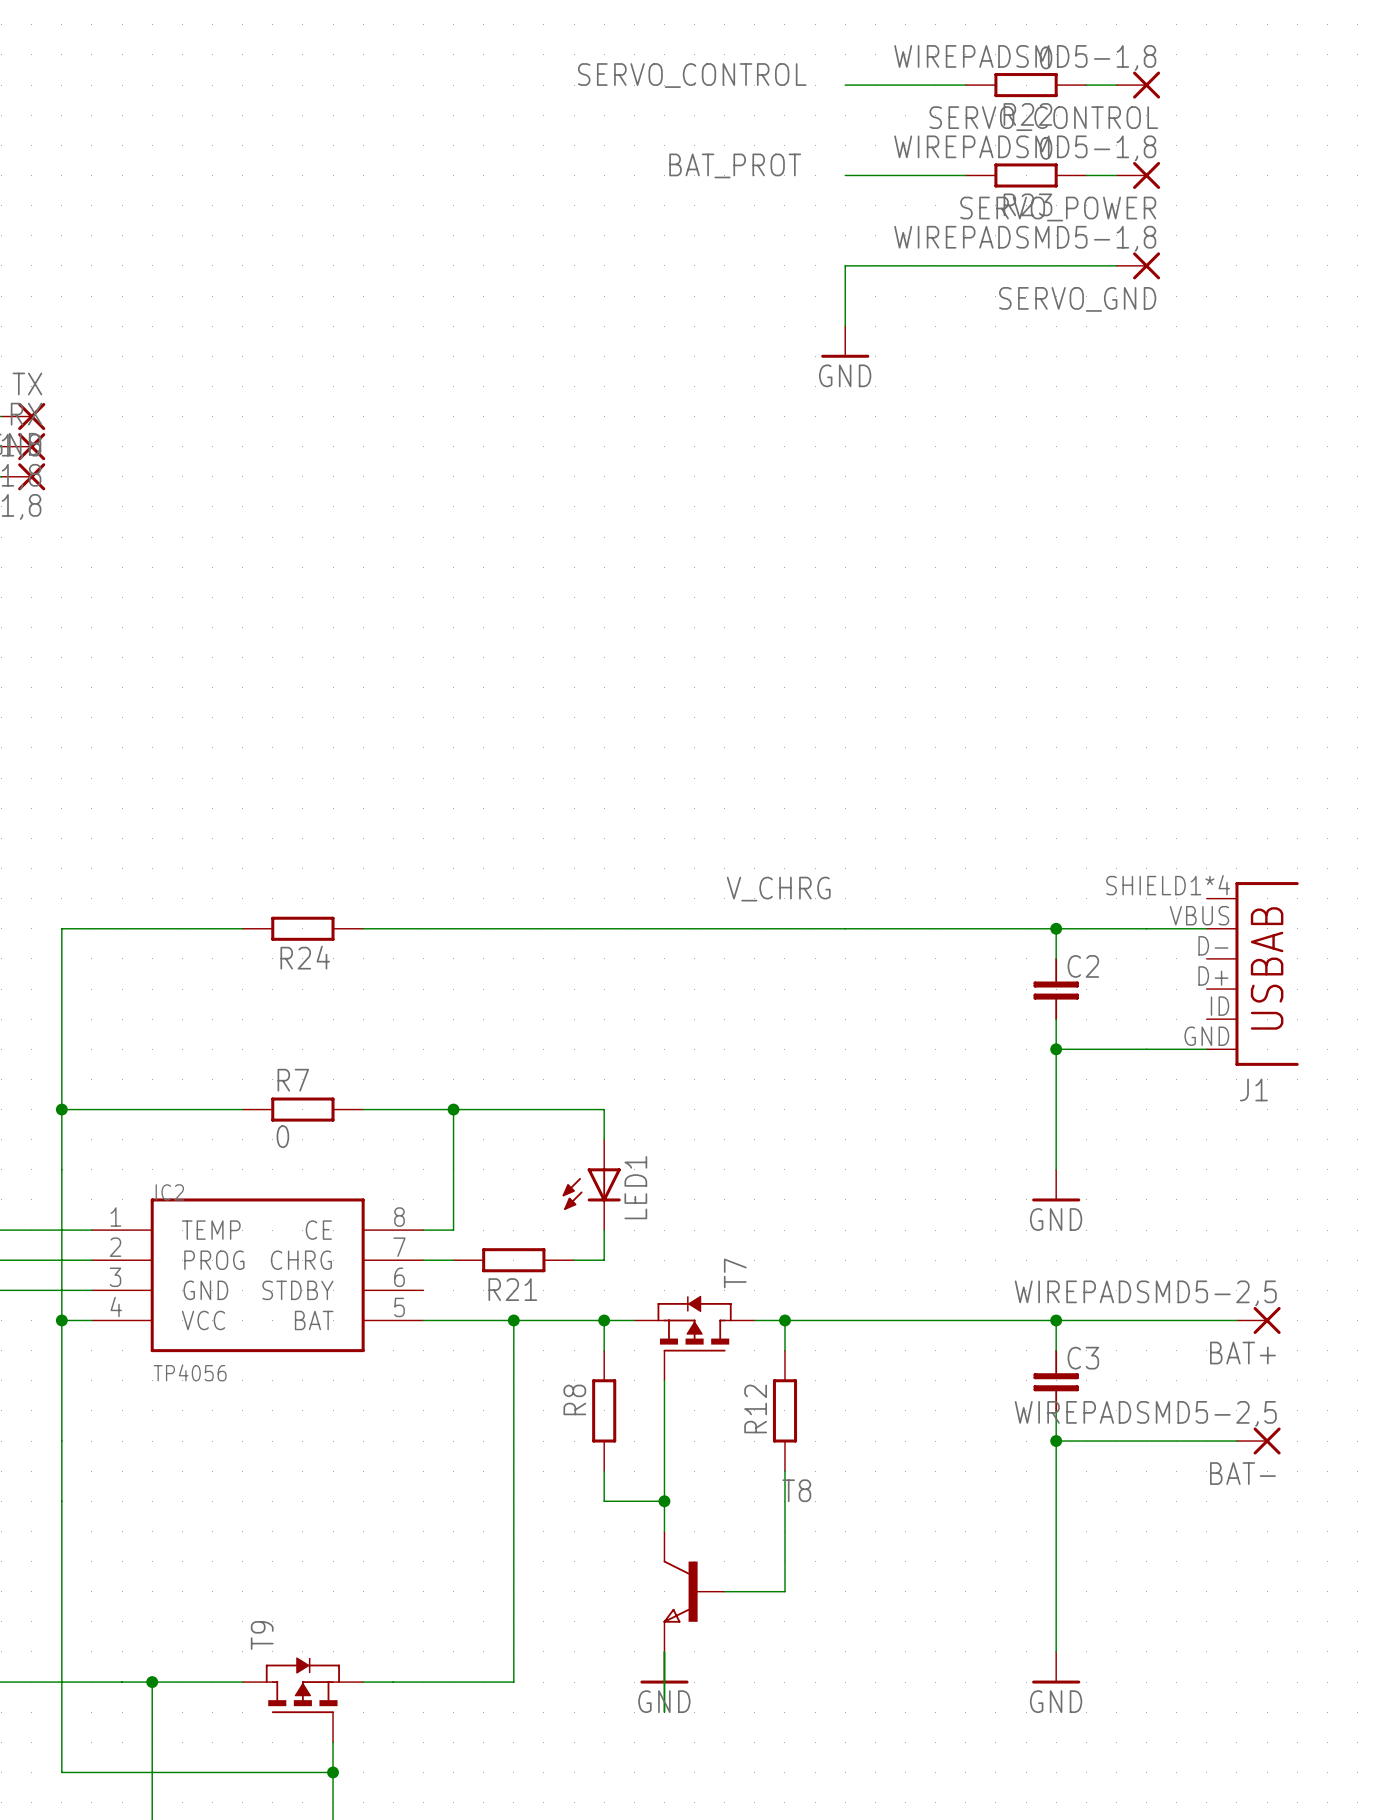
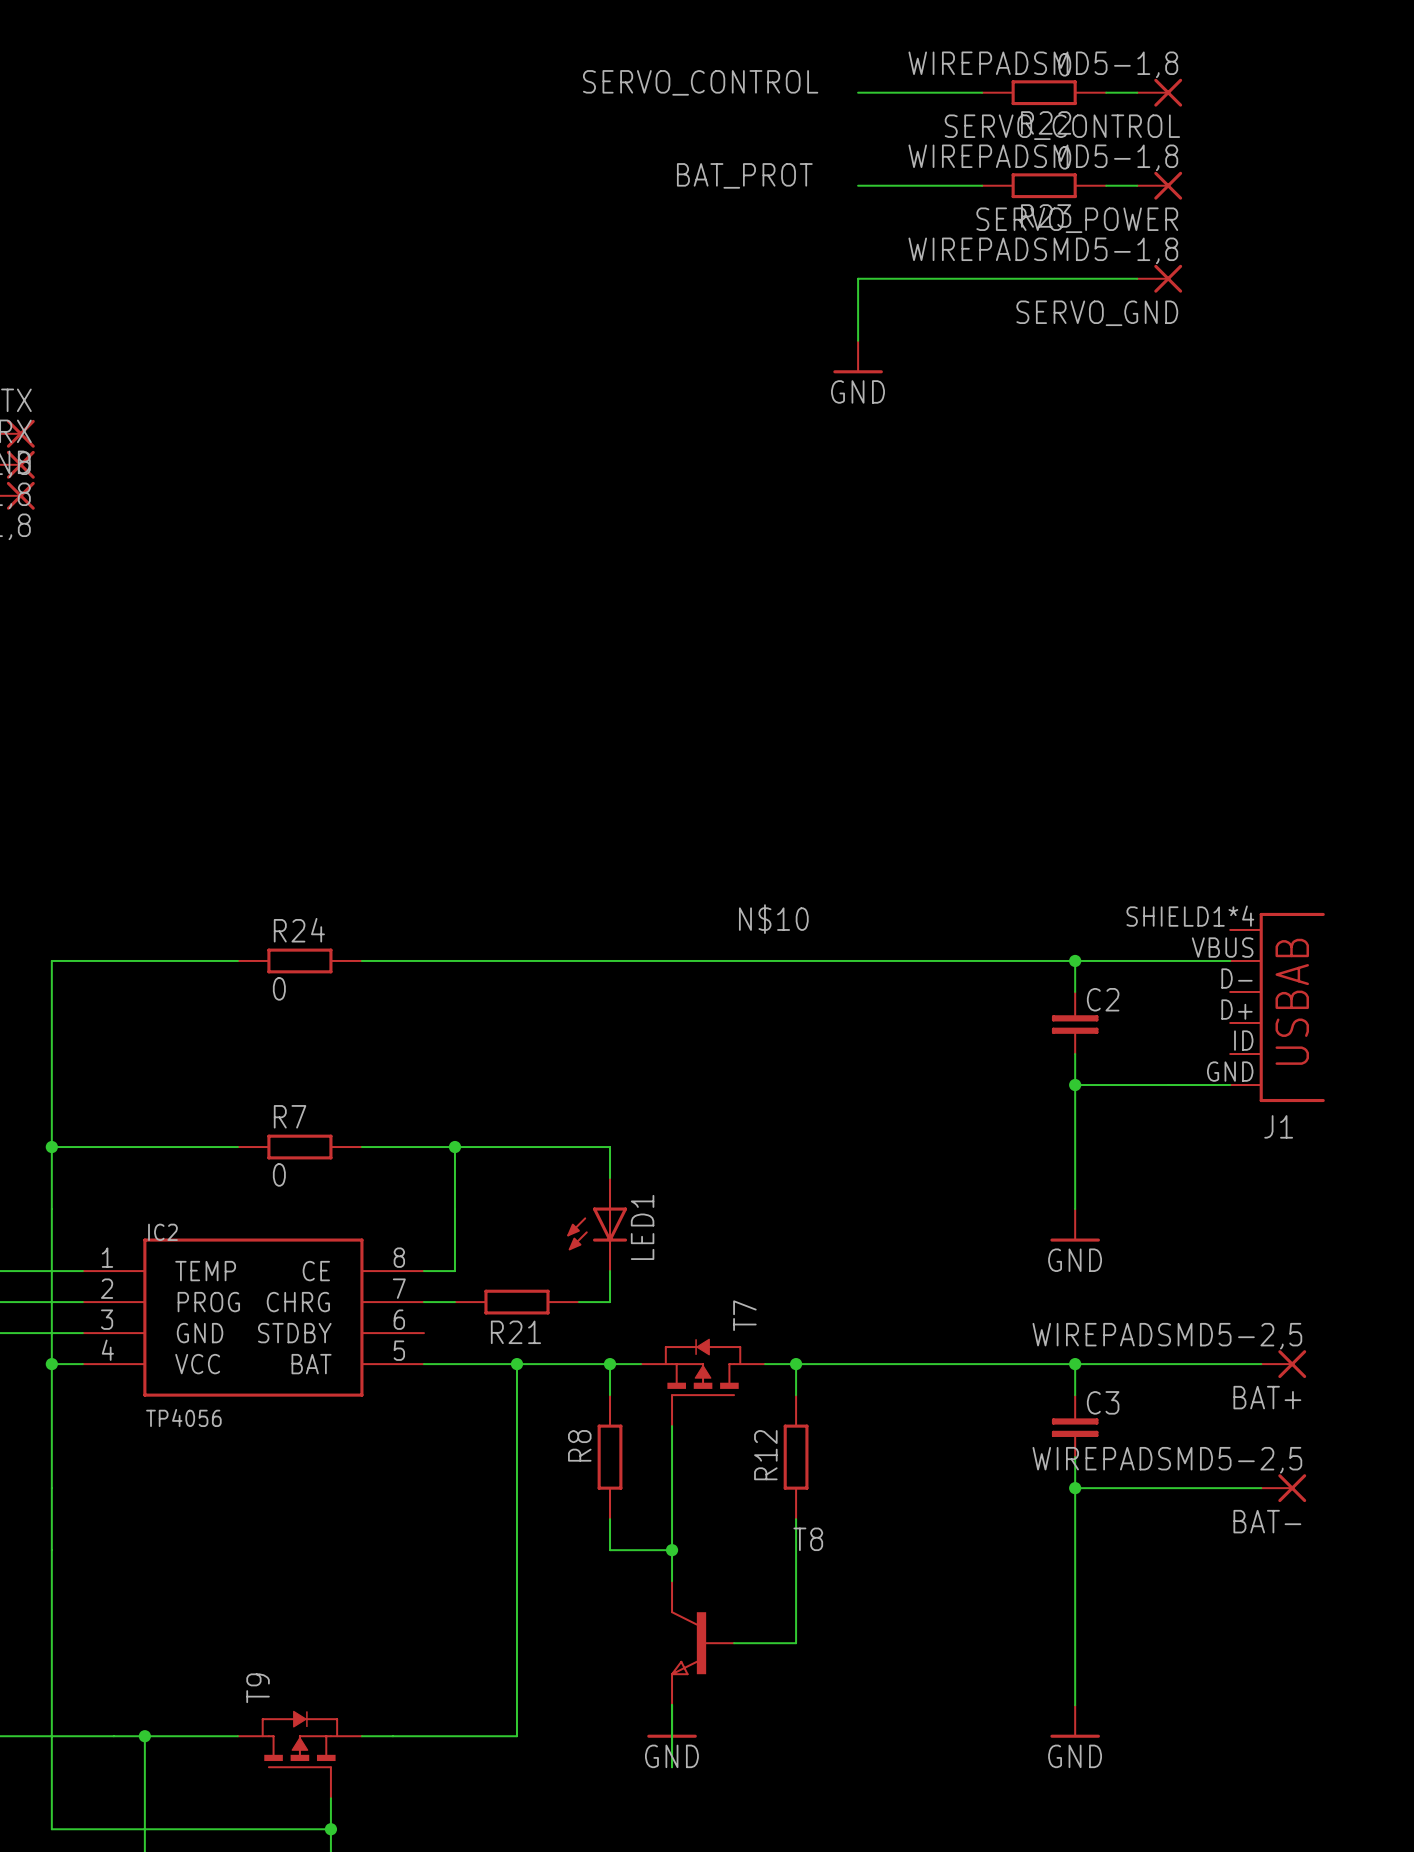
label: V_CHRG (778, 889) -> N$10 (773, 919)
R24 value: none -> 0 (279, 988)
R24 name position: R24 (305, 957) -> R24 (299, 930)

